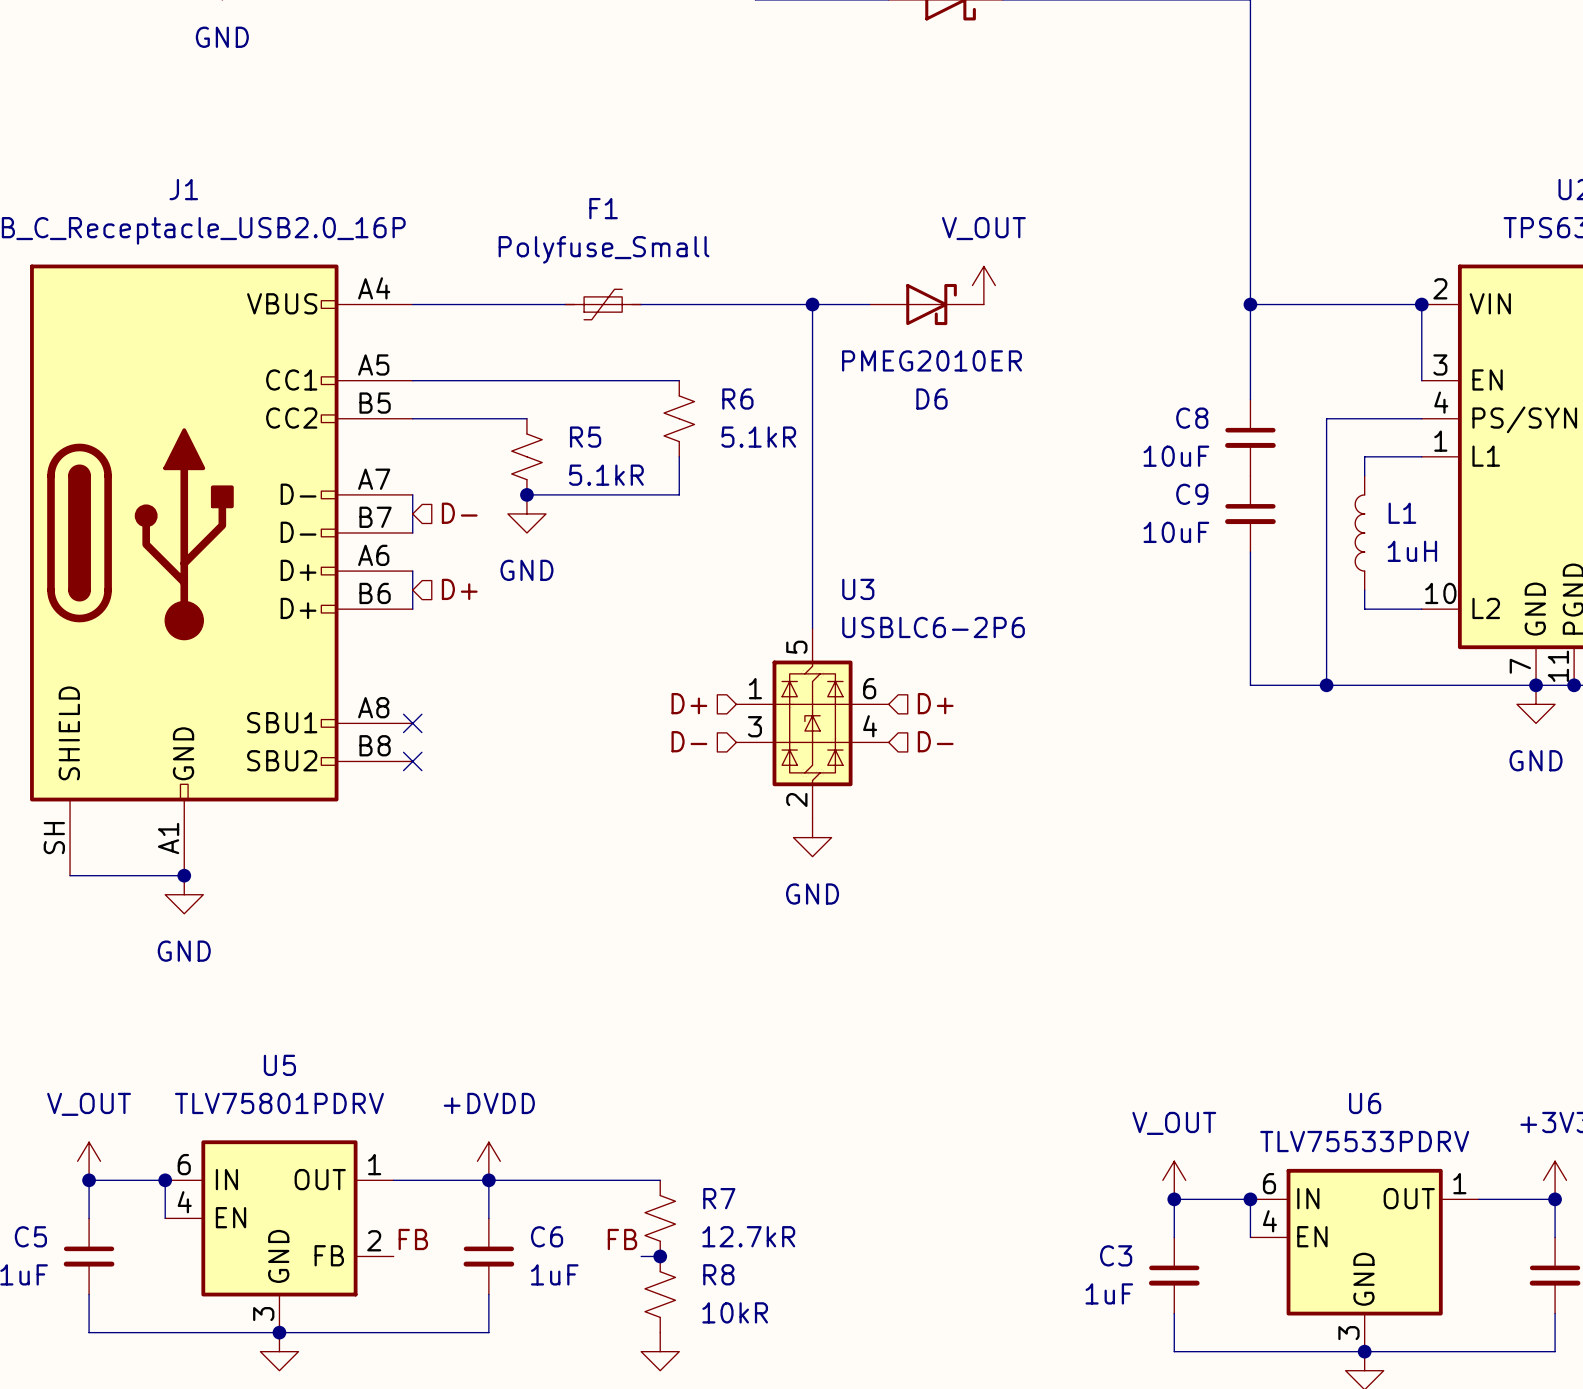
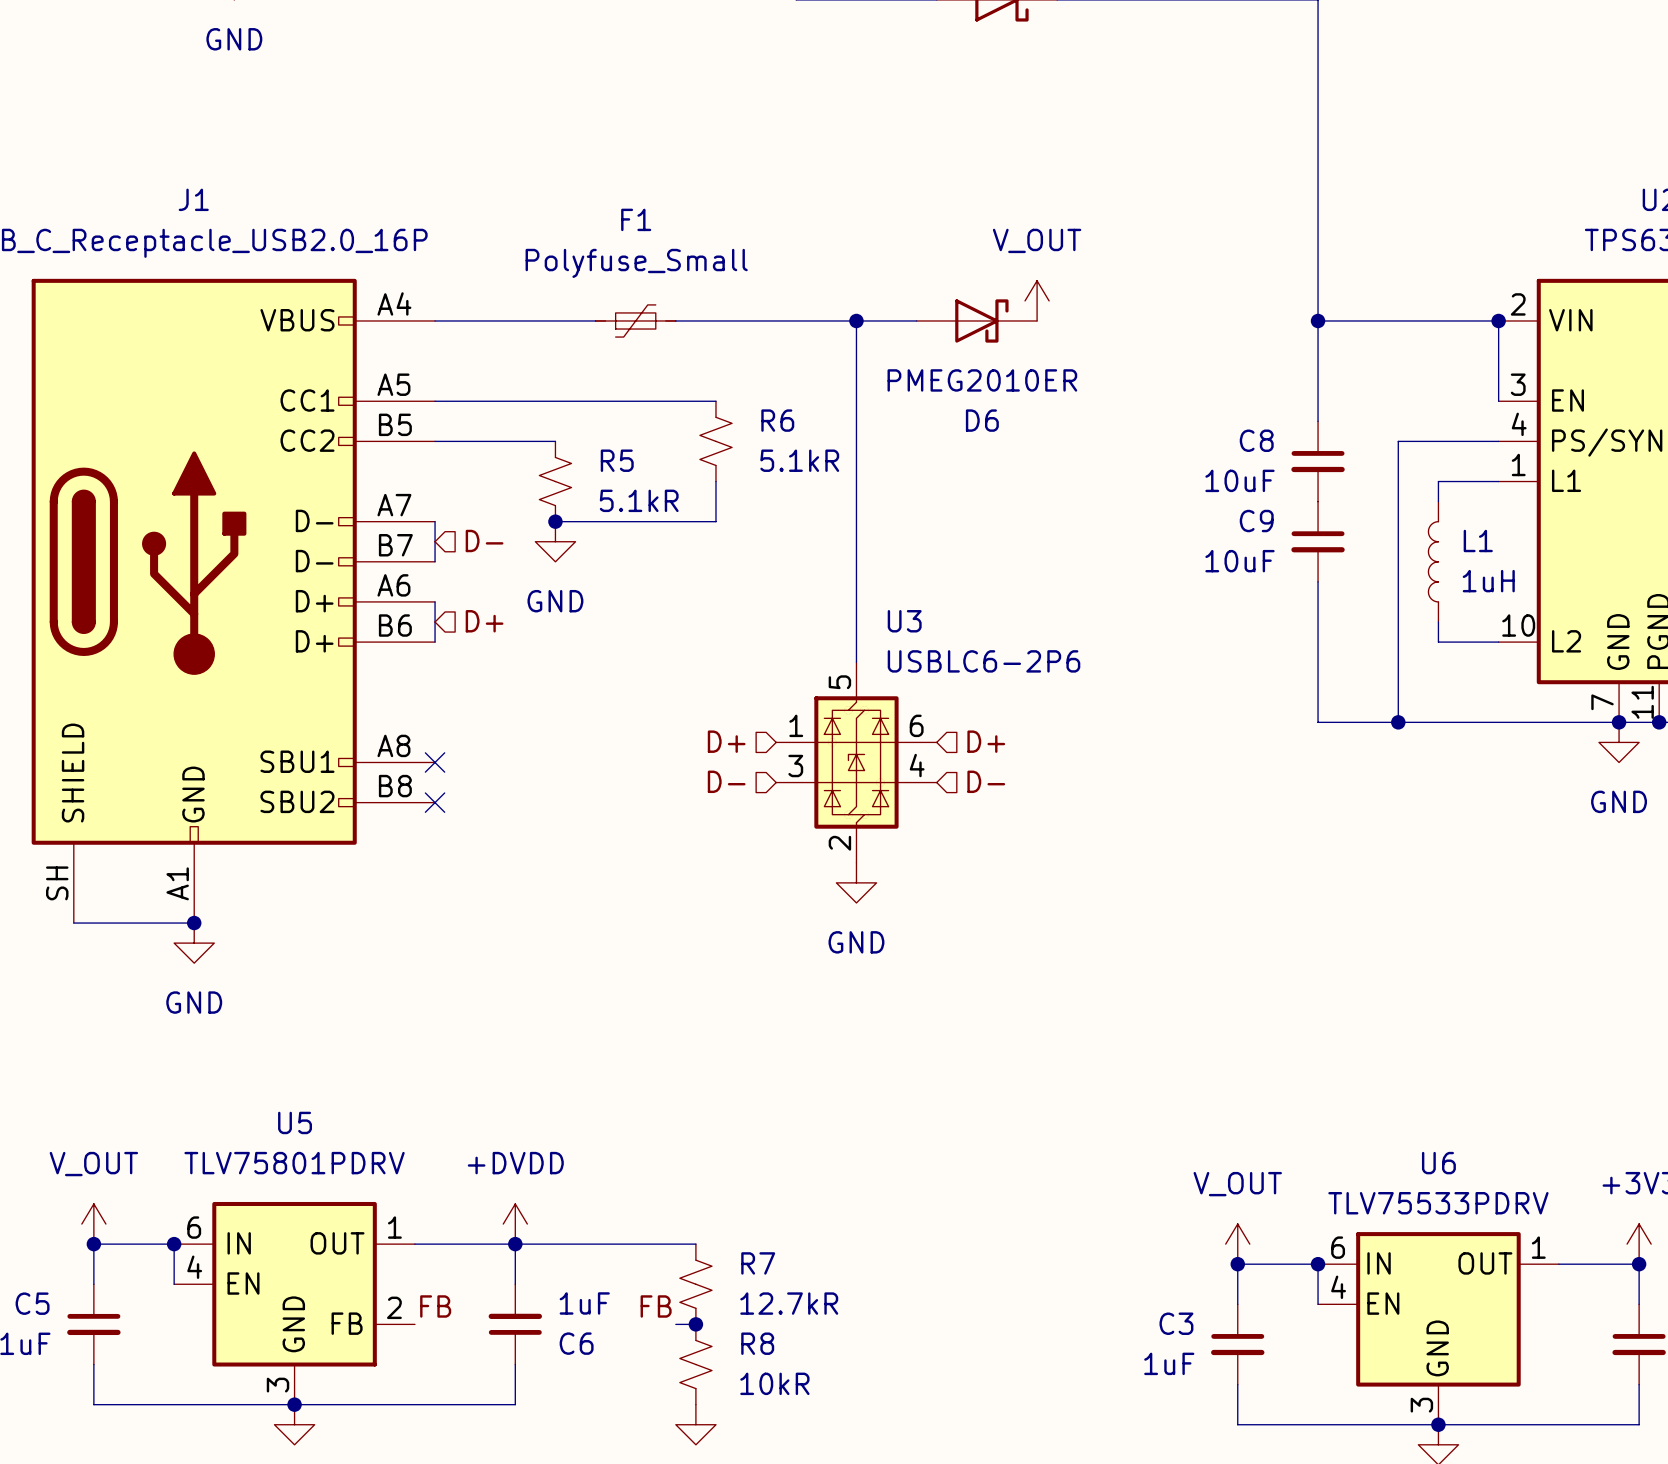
C6 name position: C6 (547, 1236) -> C6 (576, 1343)
C6 rotation: 0° (488, 1256) -> 180° (515, 1324)
C6 value position: 1uF (554, 1274) -> 1uF (584, 1303)

